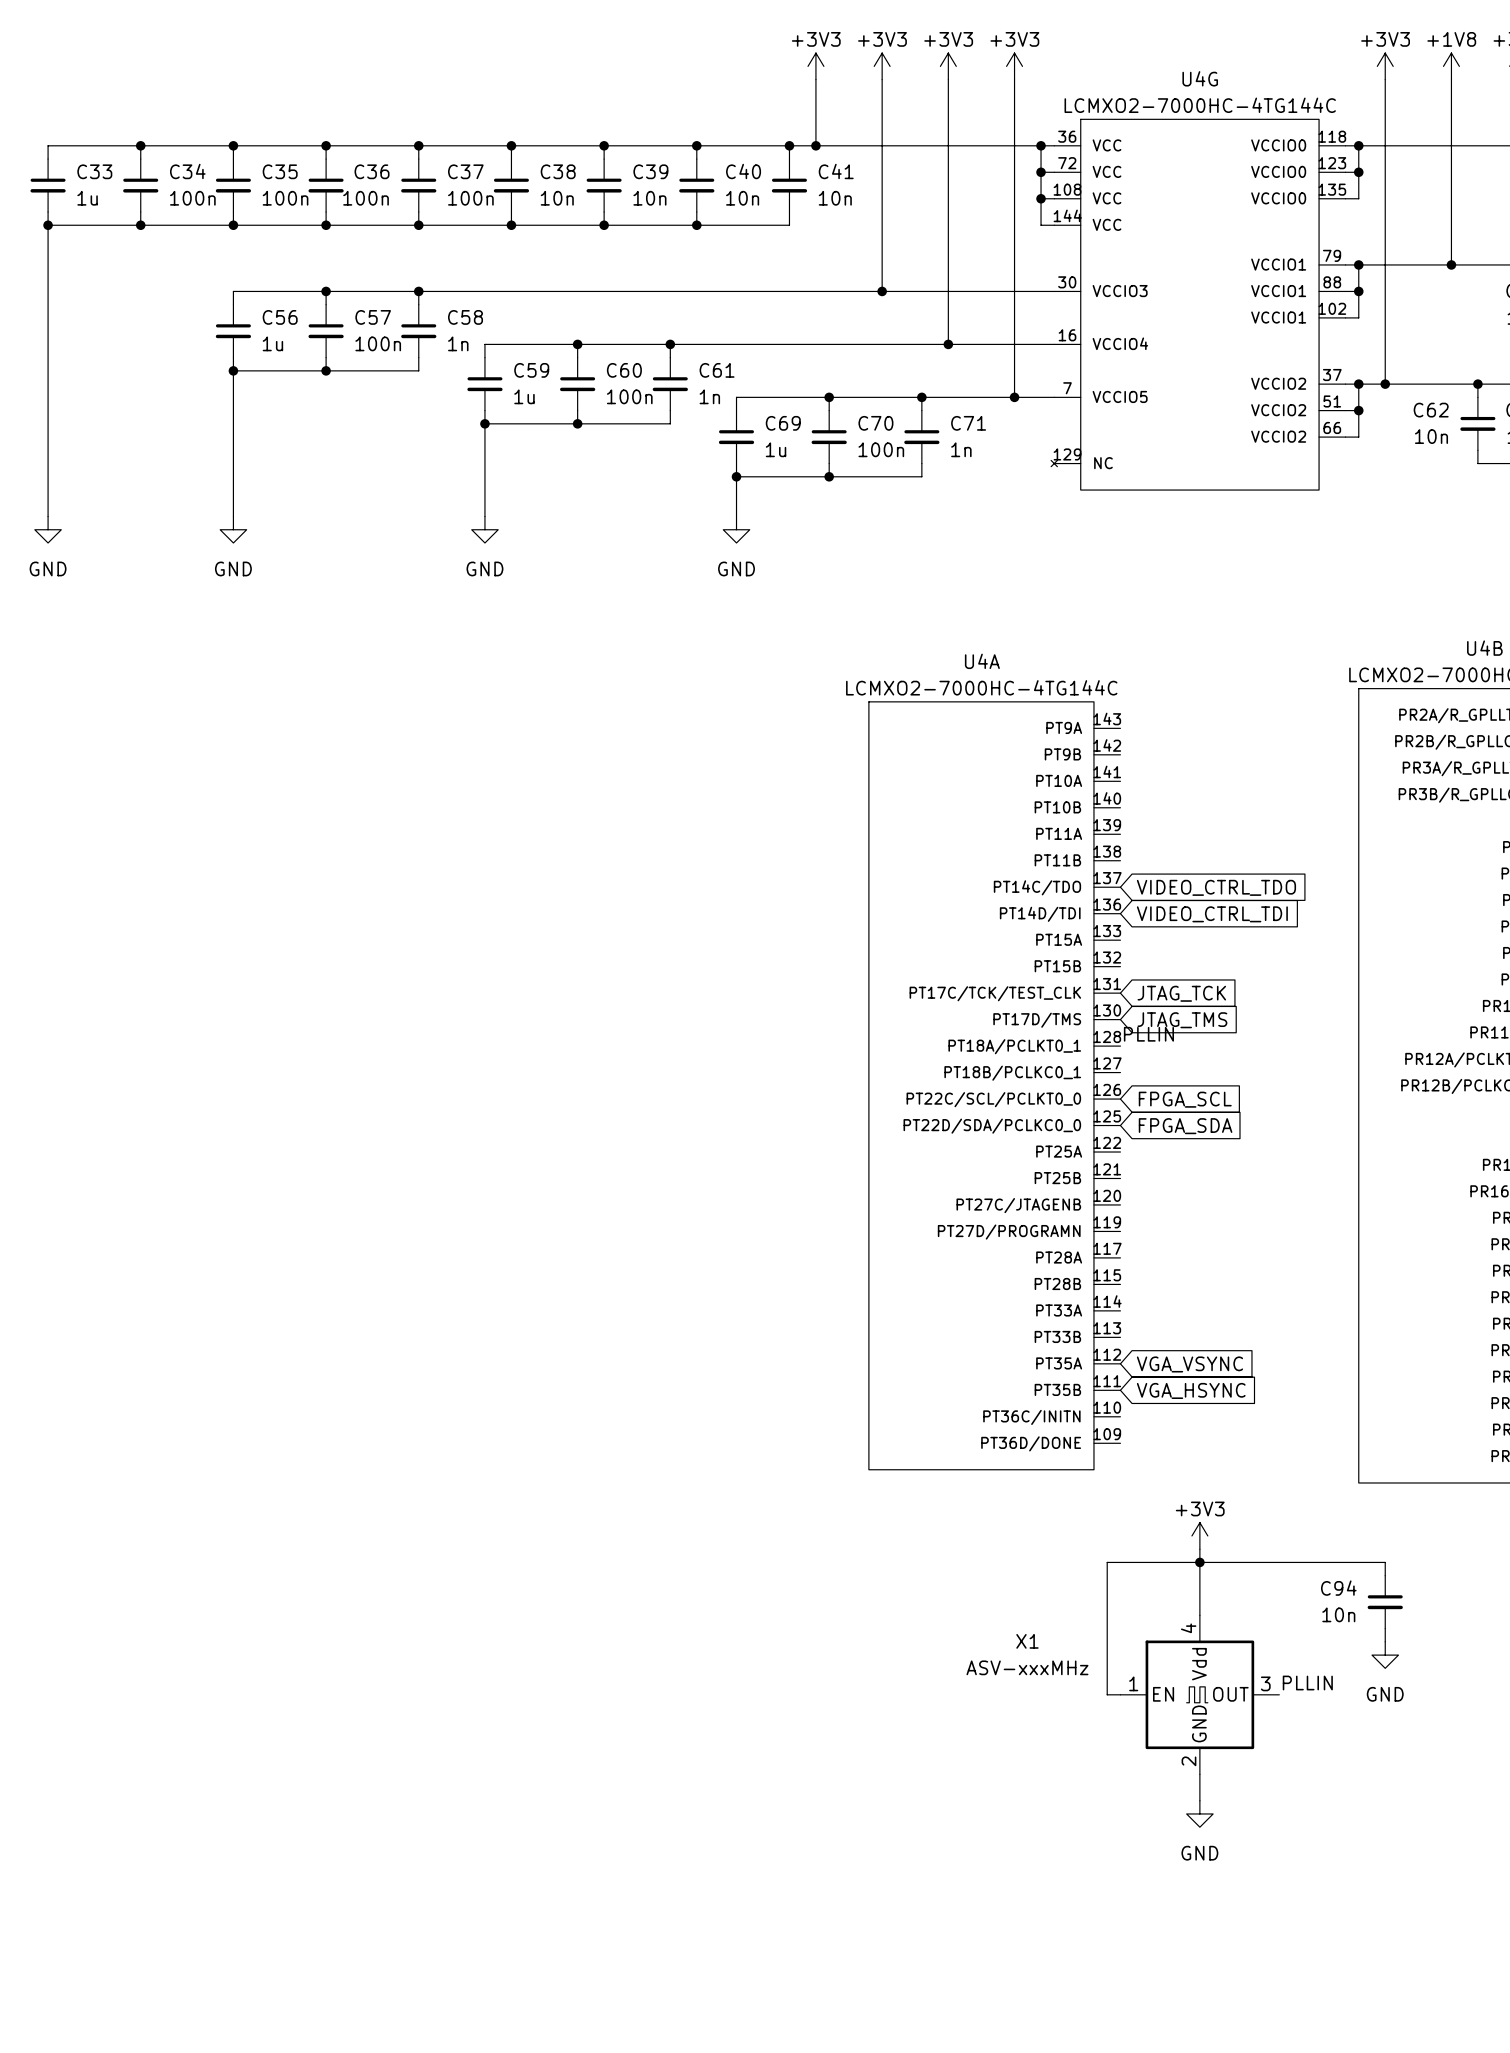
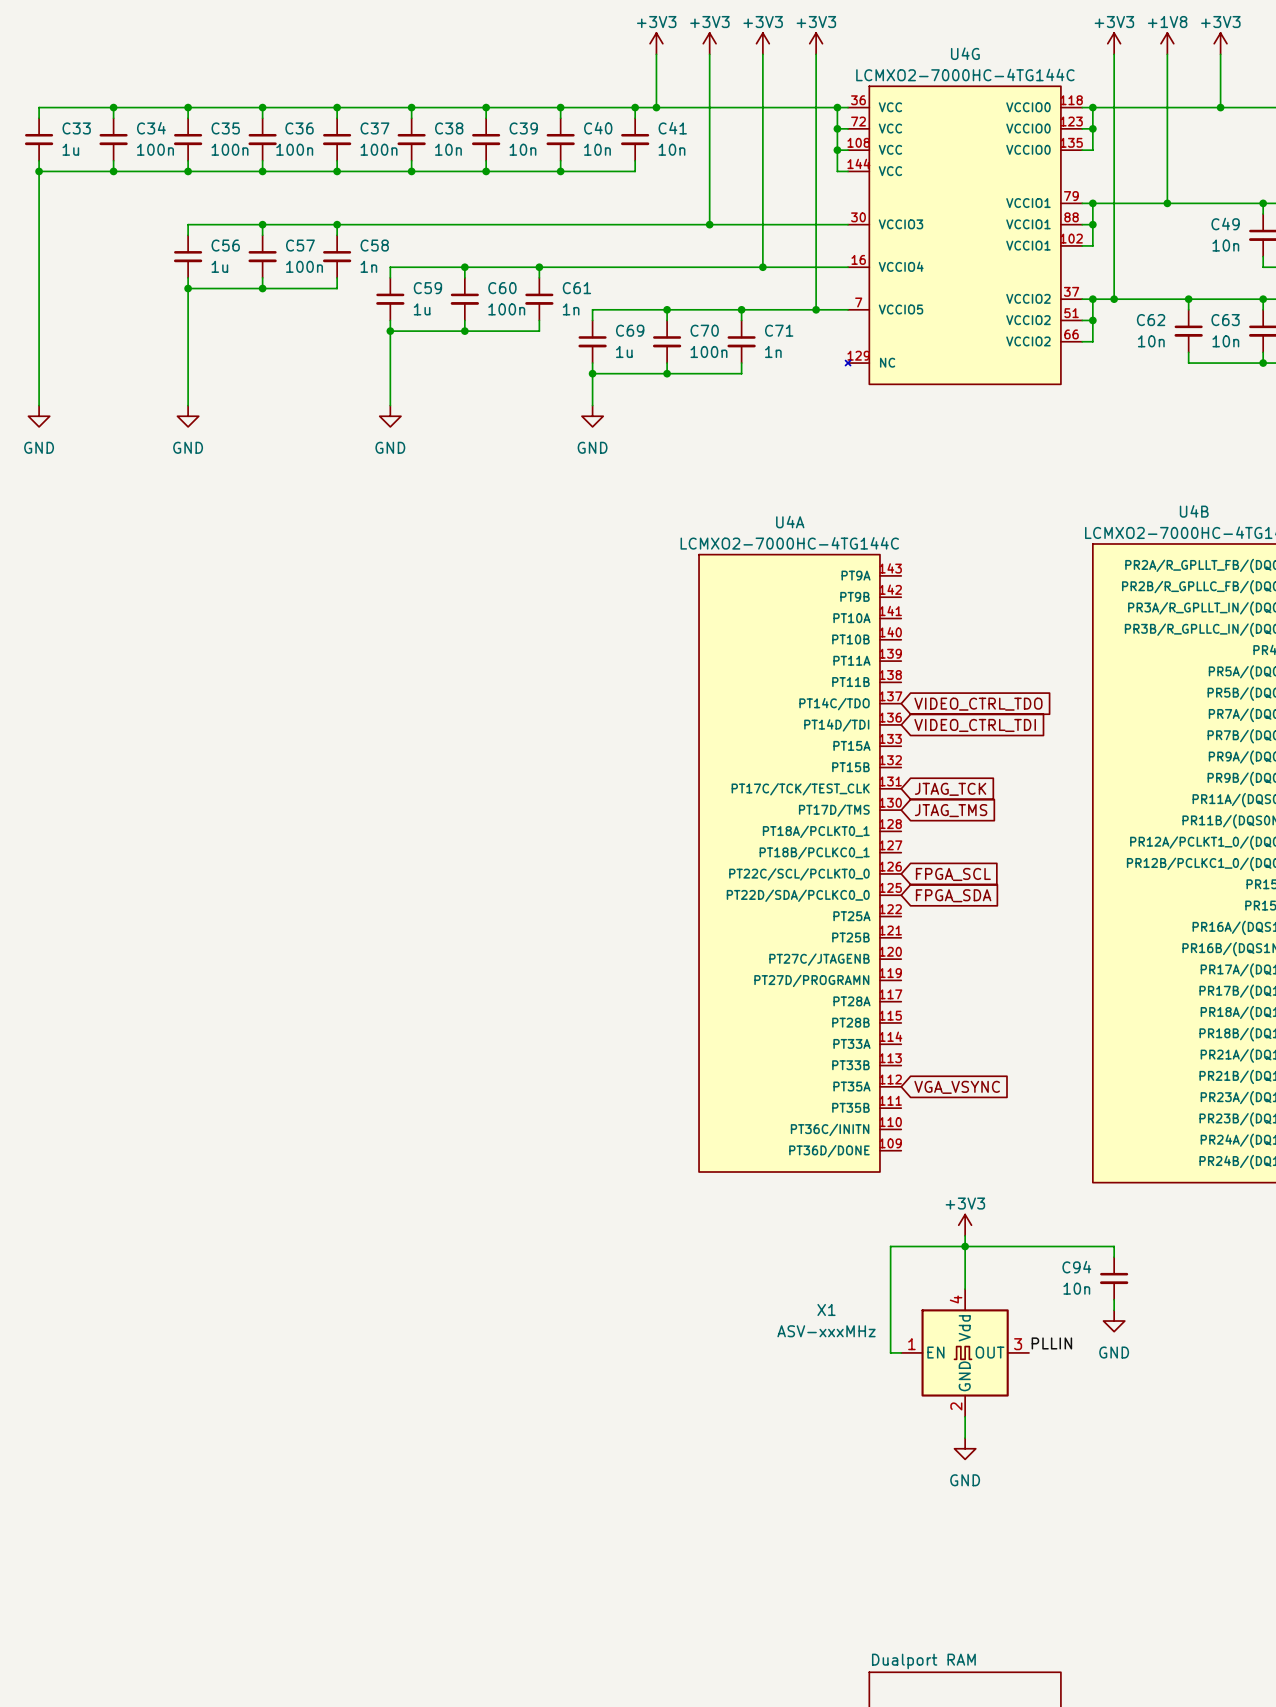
label: PLLIN (1148, 1034) -> none
global label: VGA_HSYNC (1191, 1390) -> none

